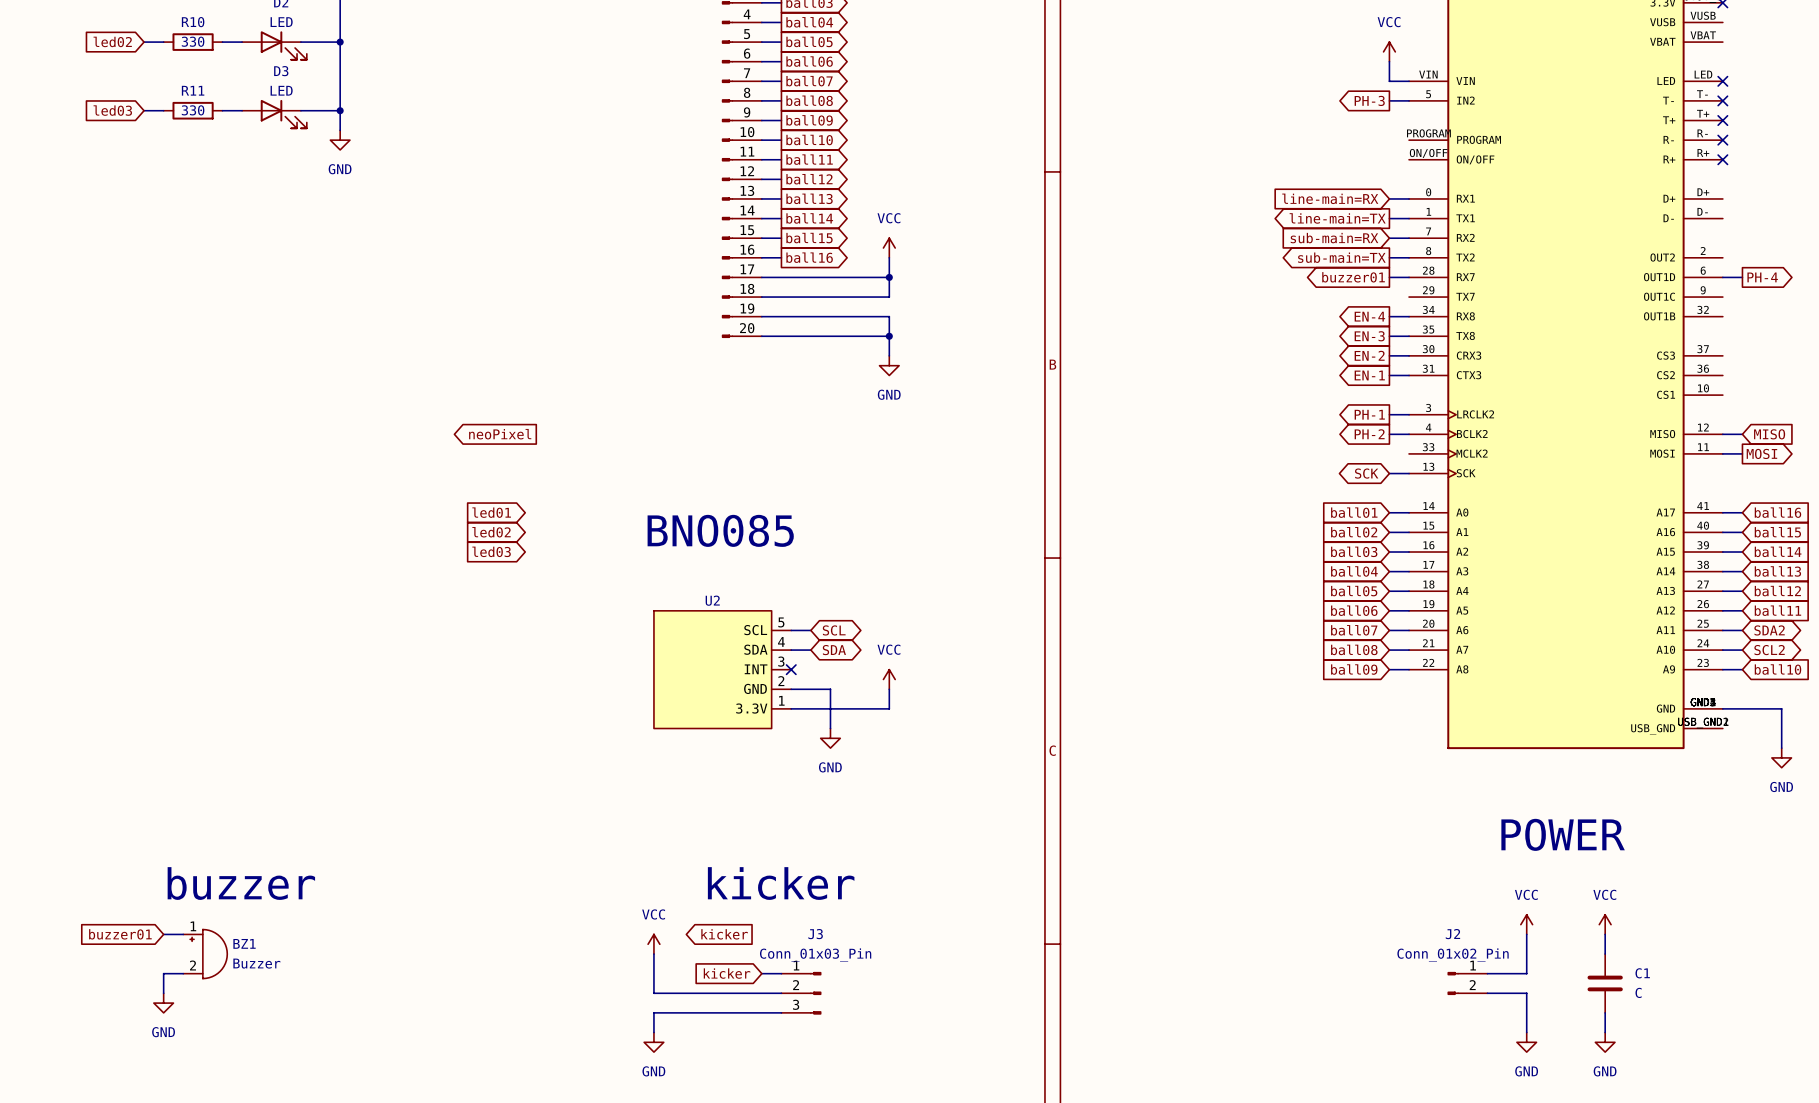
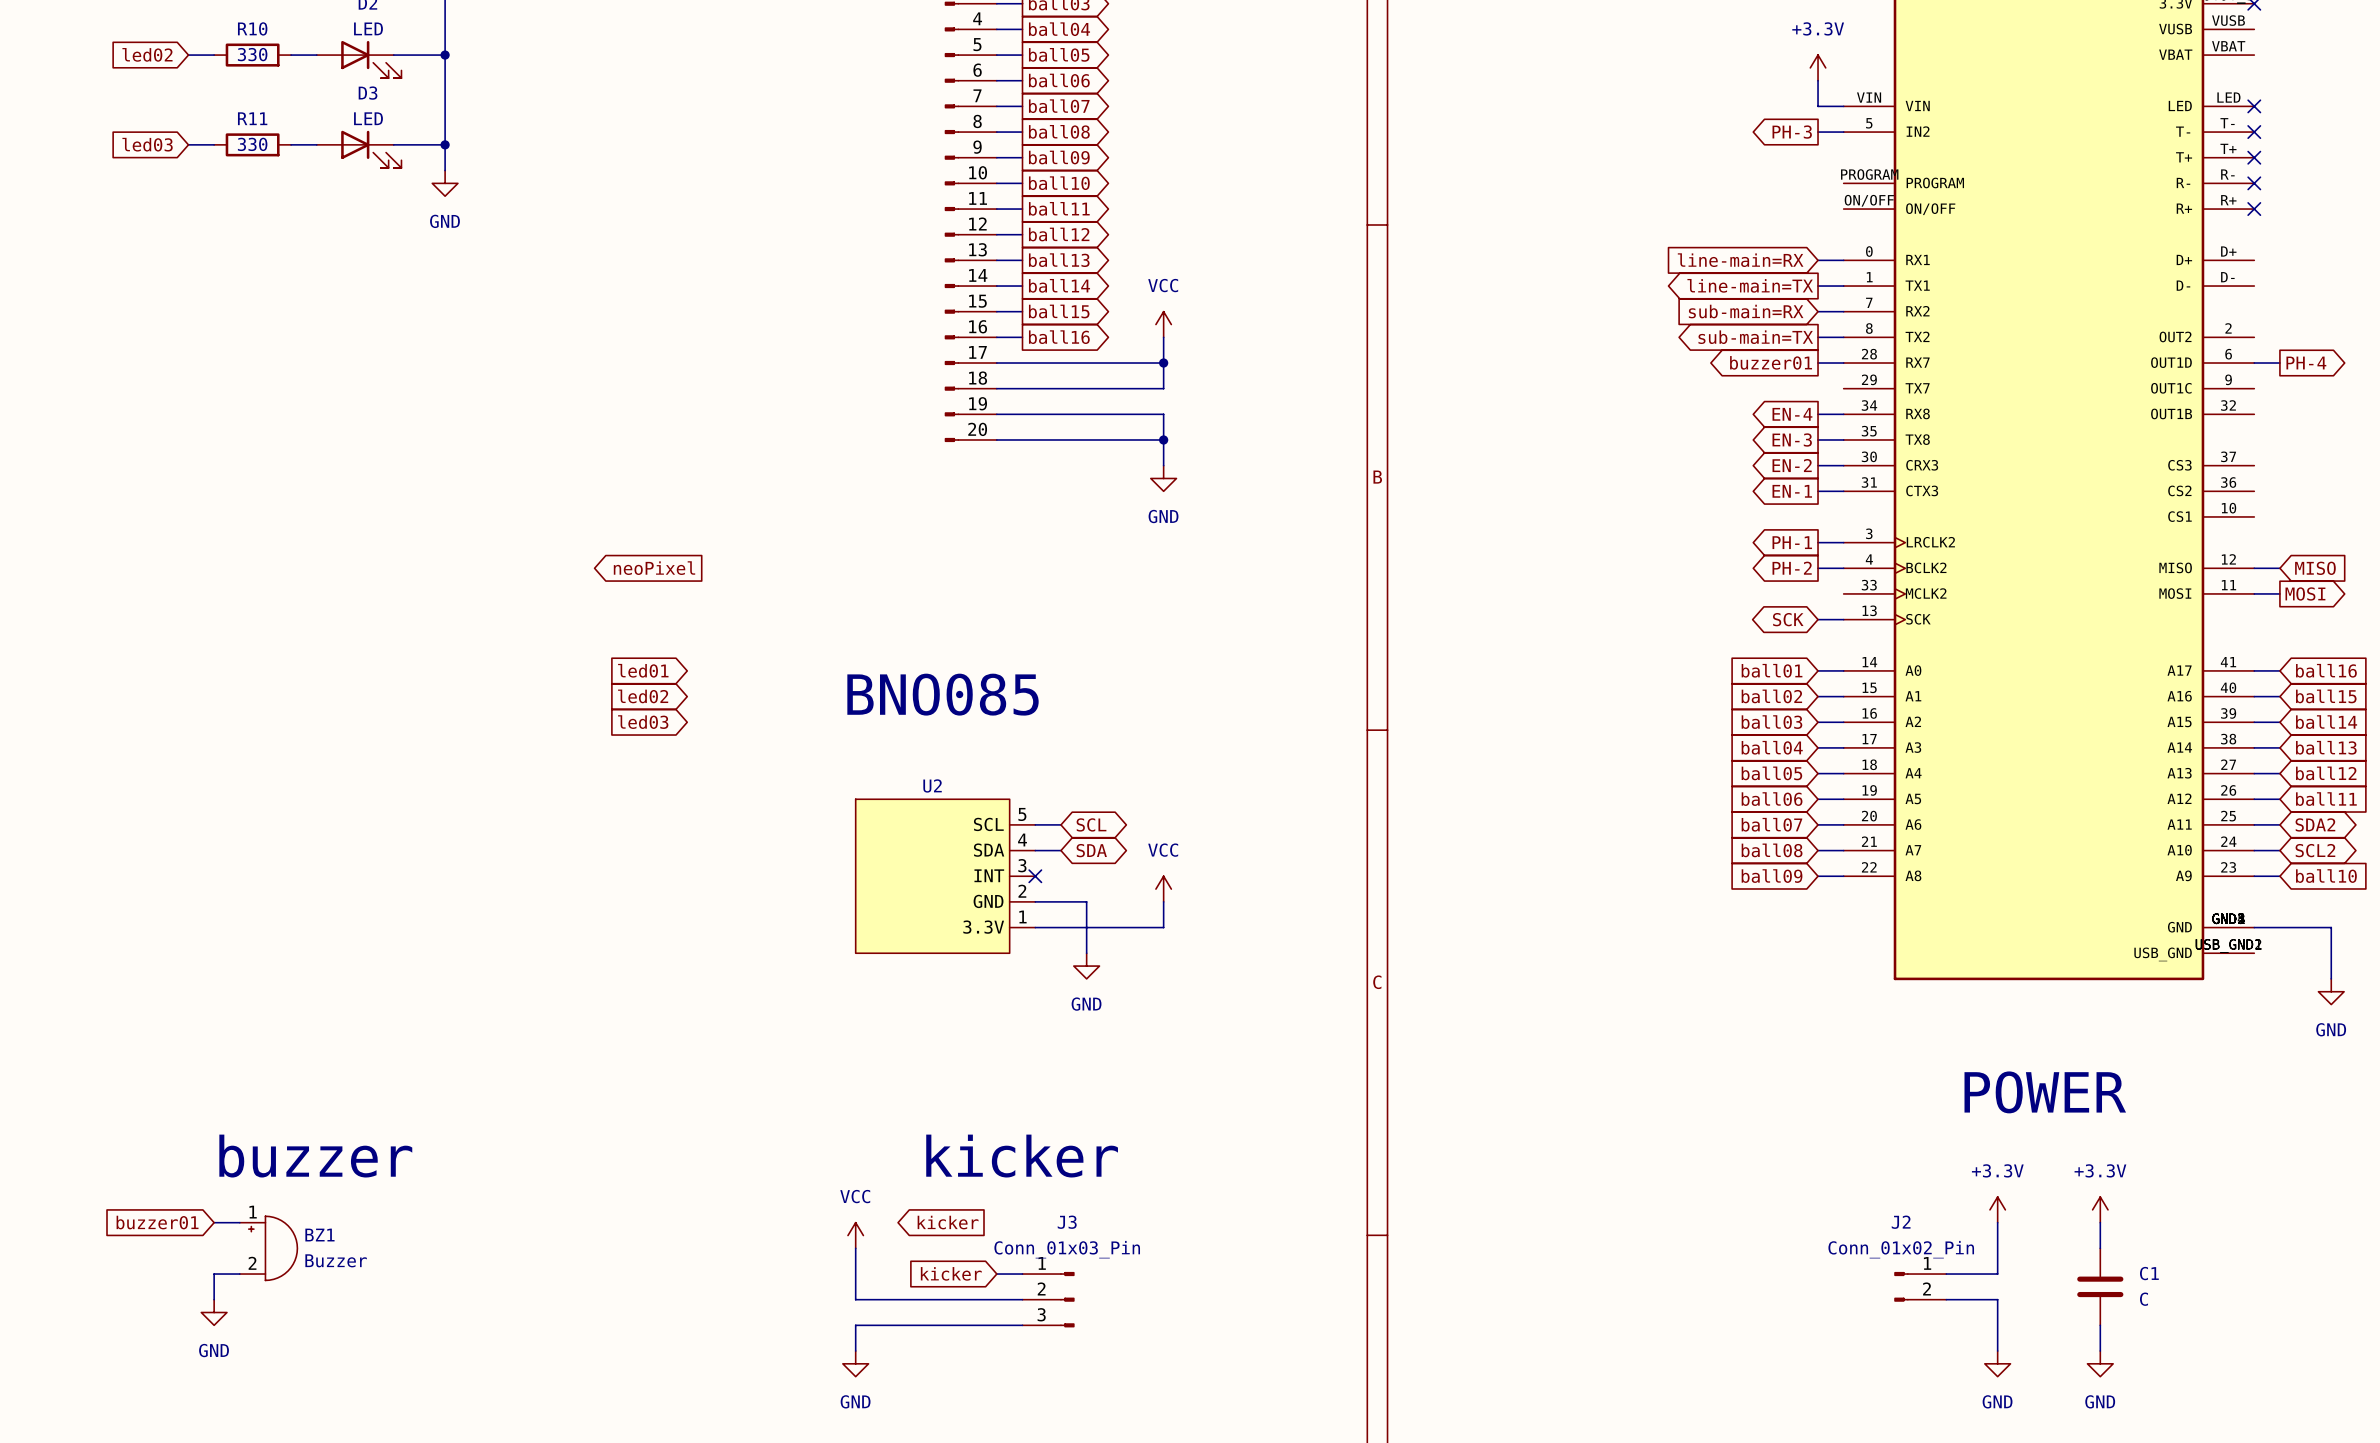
power symbol: VCC (1389, 51) -> +3.3V (1818, 67)
power symbol: VCC (1526, 924) -> +3.3V (1997, 1209)
power symbol: VCC (1605, 924) -> +3.3V (2100, 1209)

